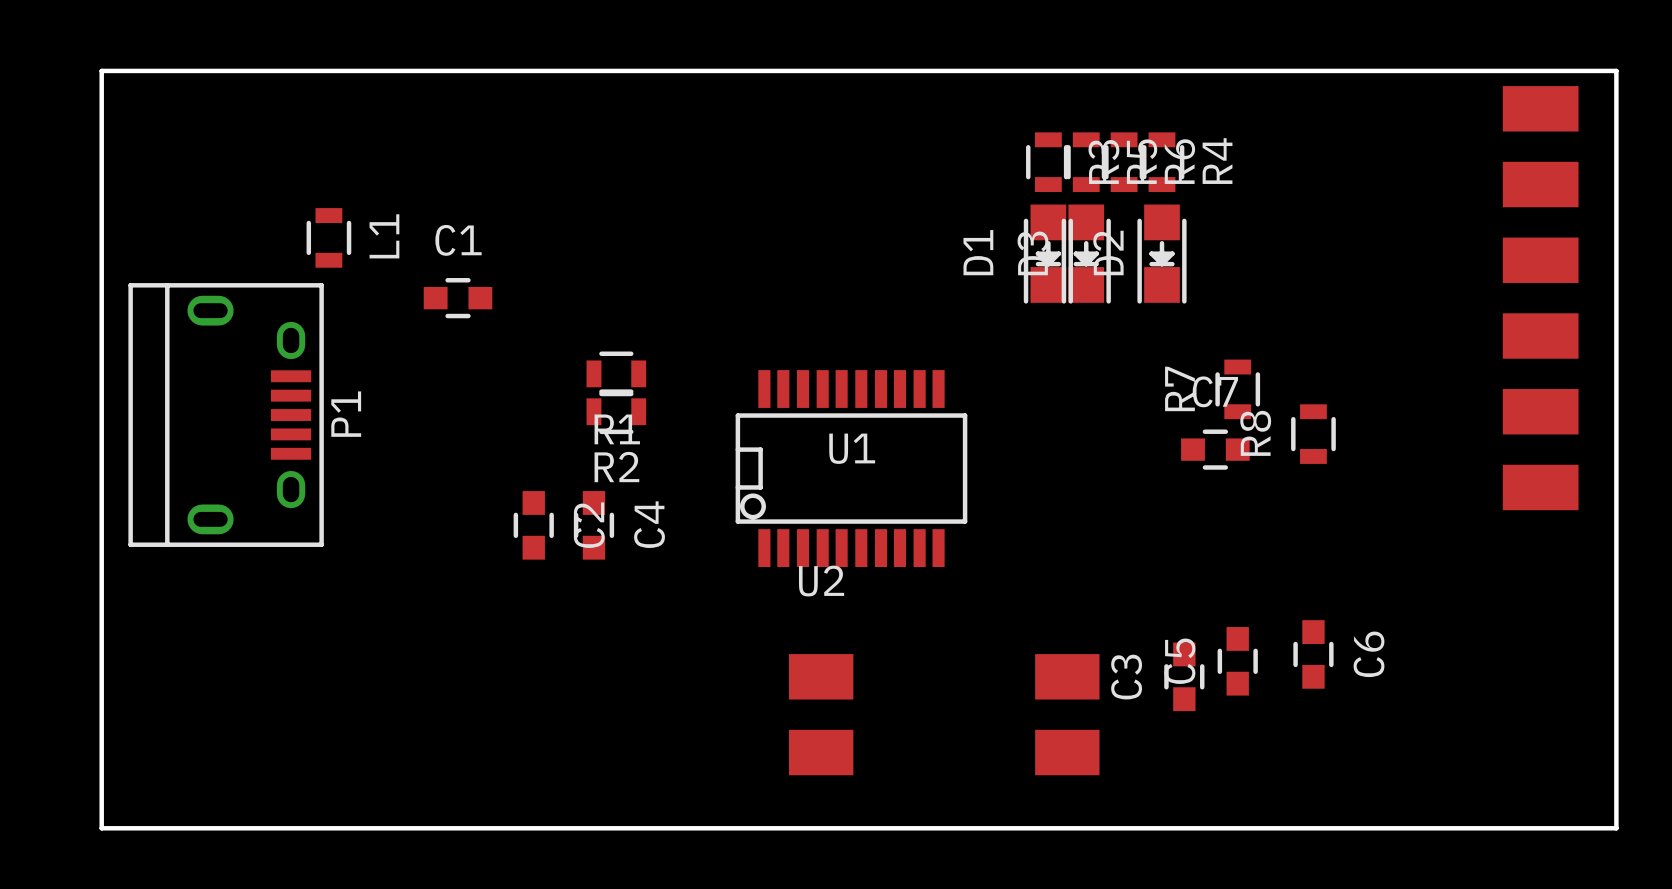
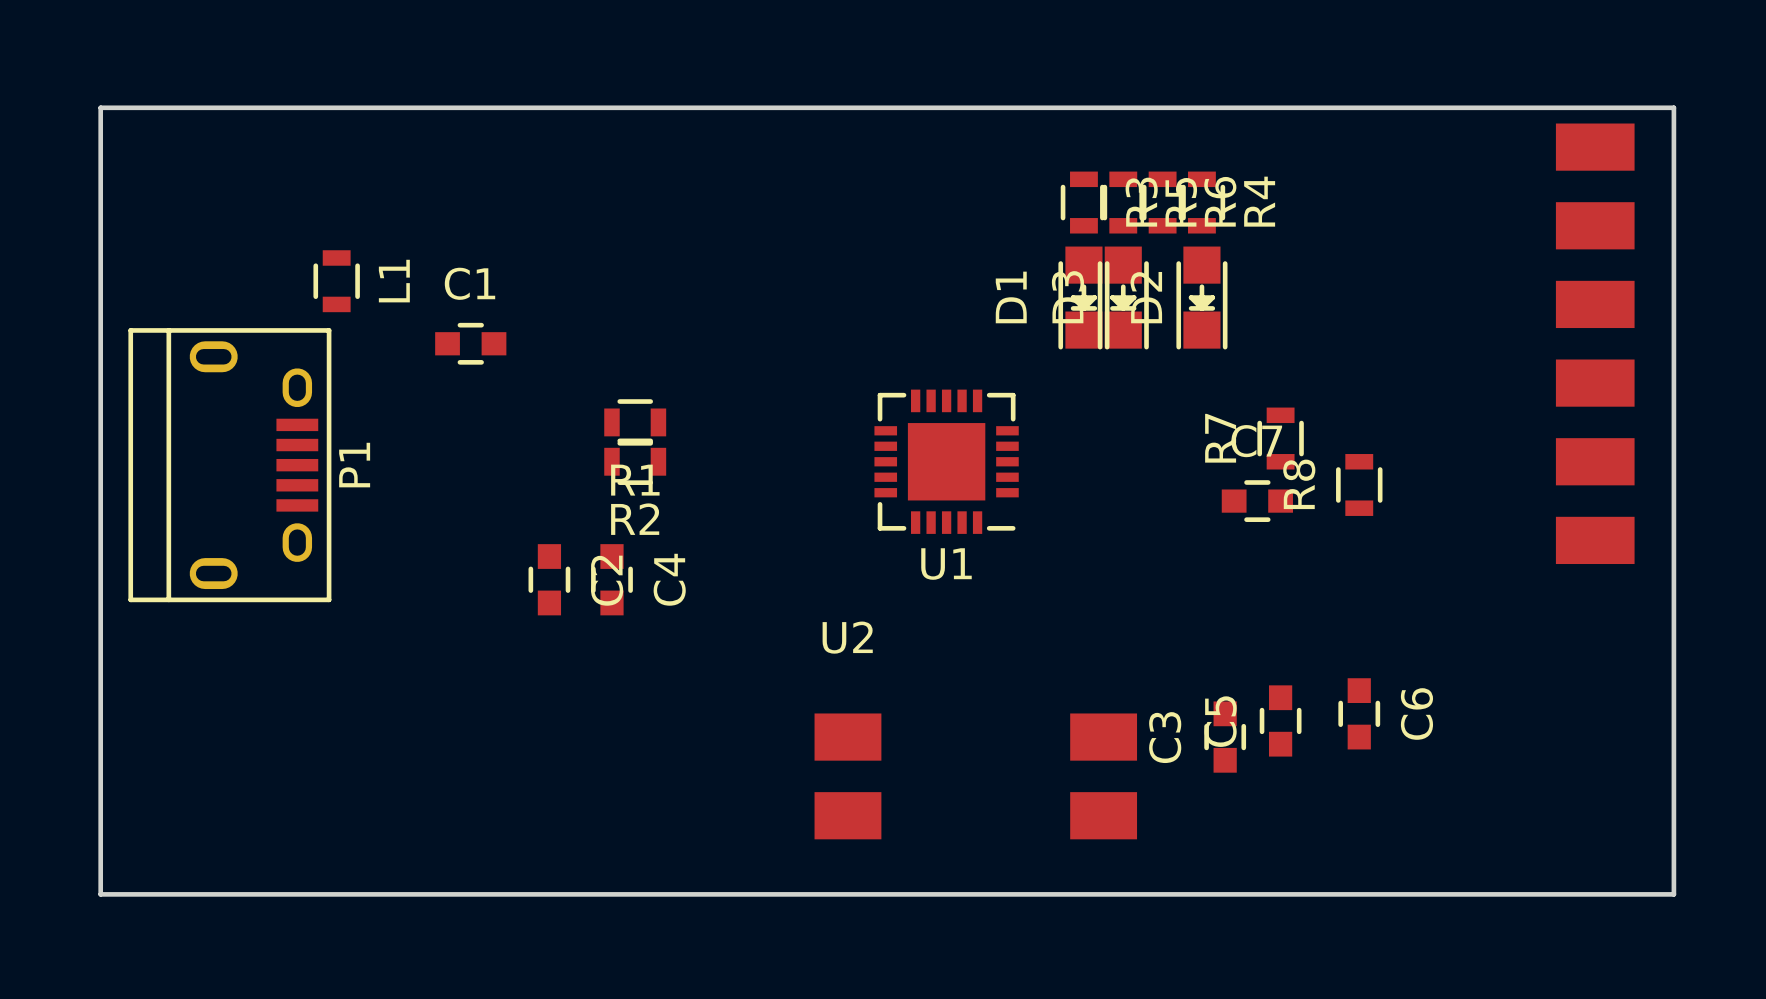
U1 footprint: [735, 370, 968, 568] -> [874, 389, 1019, 534]
U1 name position: U1 (852, 448) -> U1 (946, 564)

